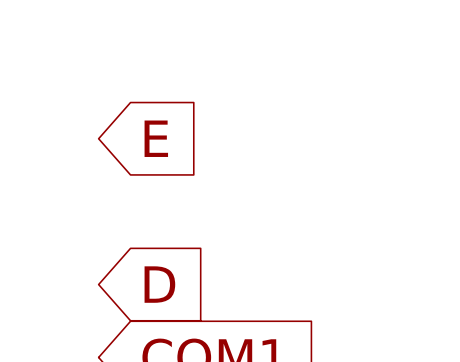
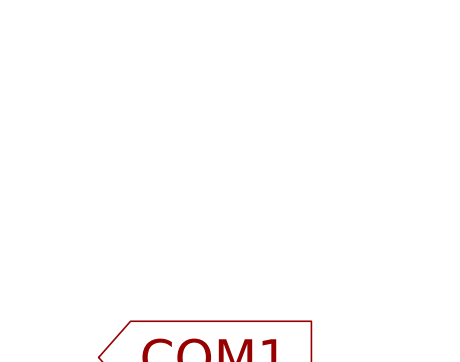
global label: E (156, 138) -> none
global label: D (159, 284) -> none

